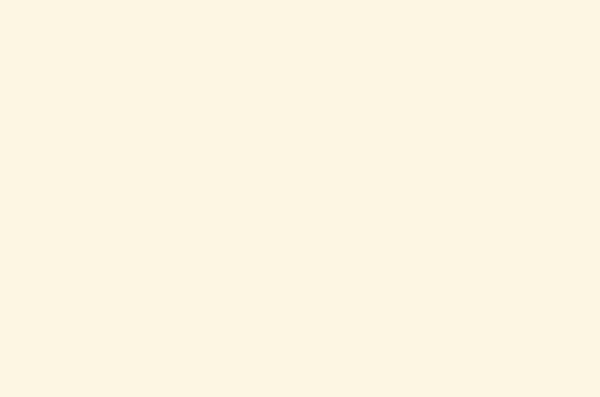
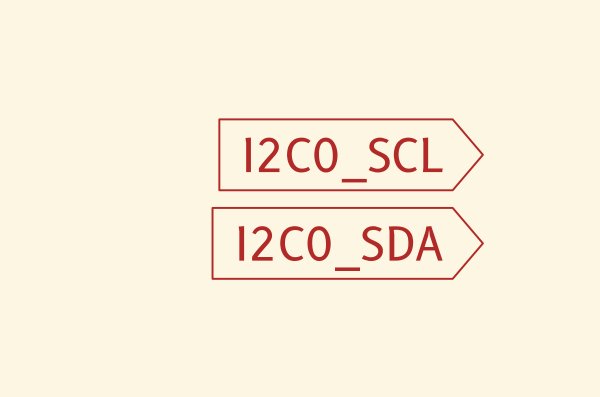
global label: none -> I2C0_SCL (344, 159)
global label: none -> I2C0_SDA (340, 248)

